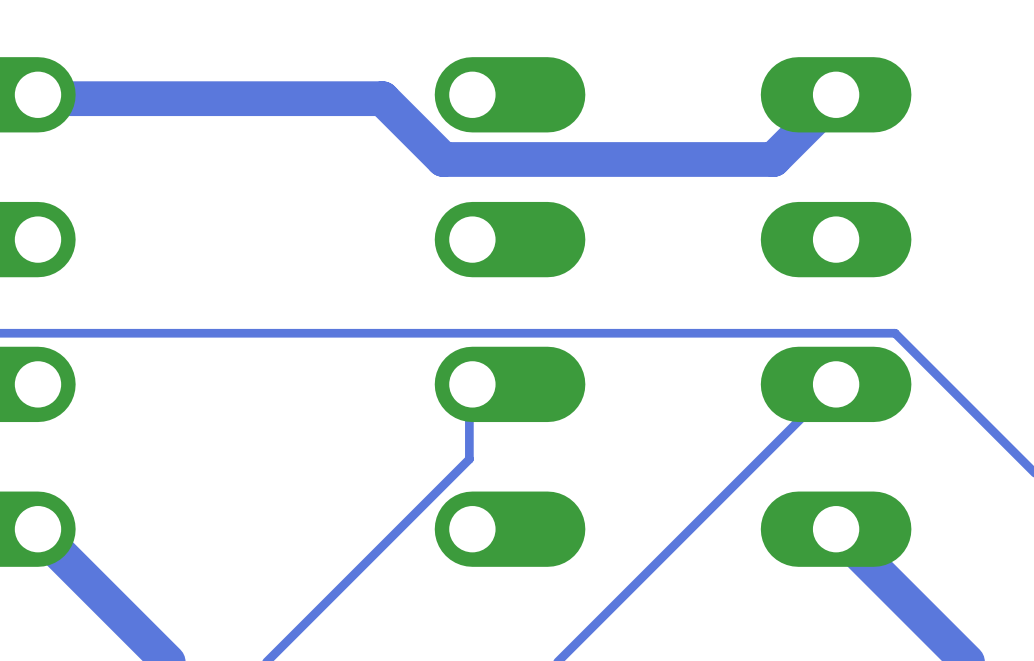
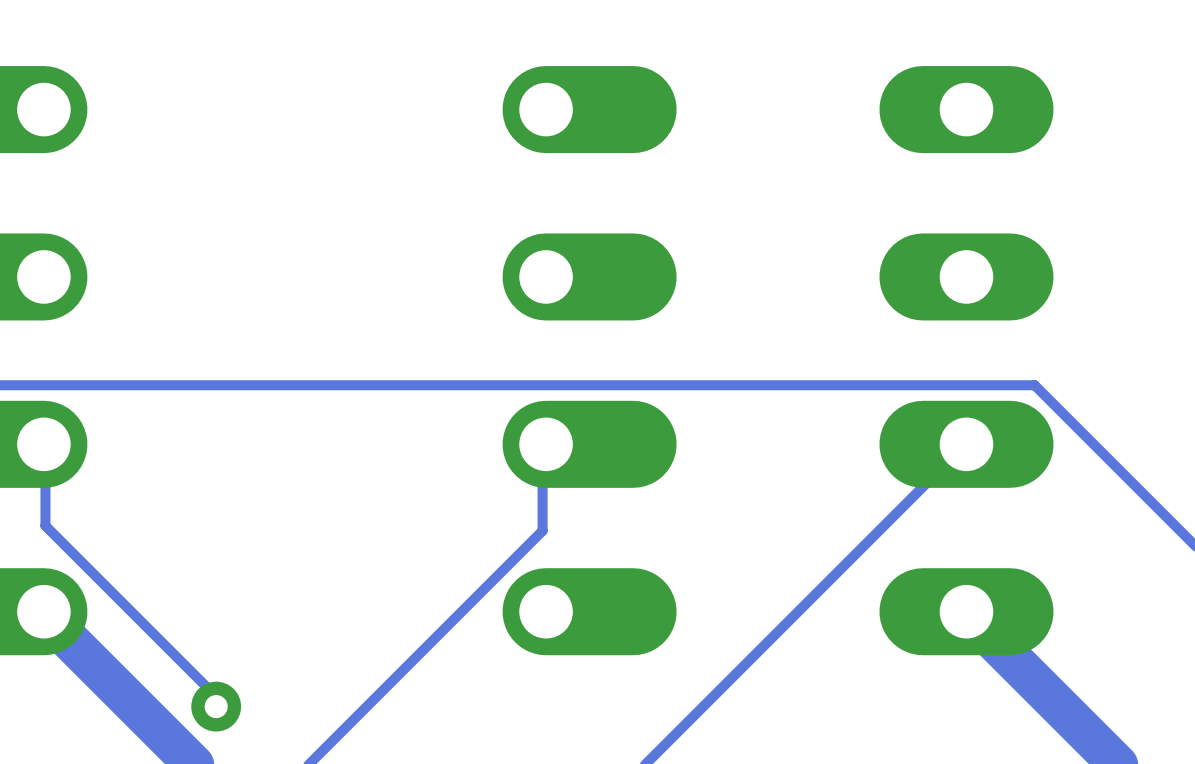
track: (836, 94) (773, 159) (443, 159) (382, 98) (39, 98) (37, 94) -> none
track: none -> (43, 444) (45, 445) (45, 525) (216, 696) (216, 706)
via: none -> (216, 706)

